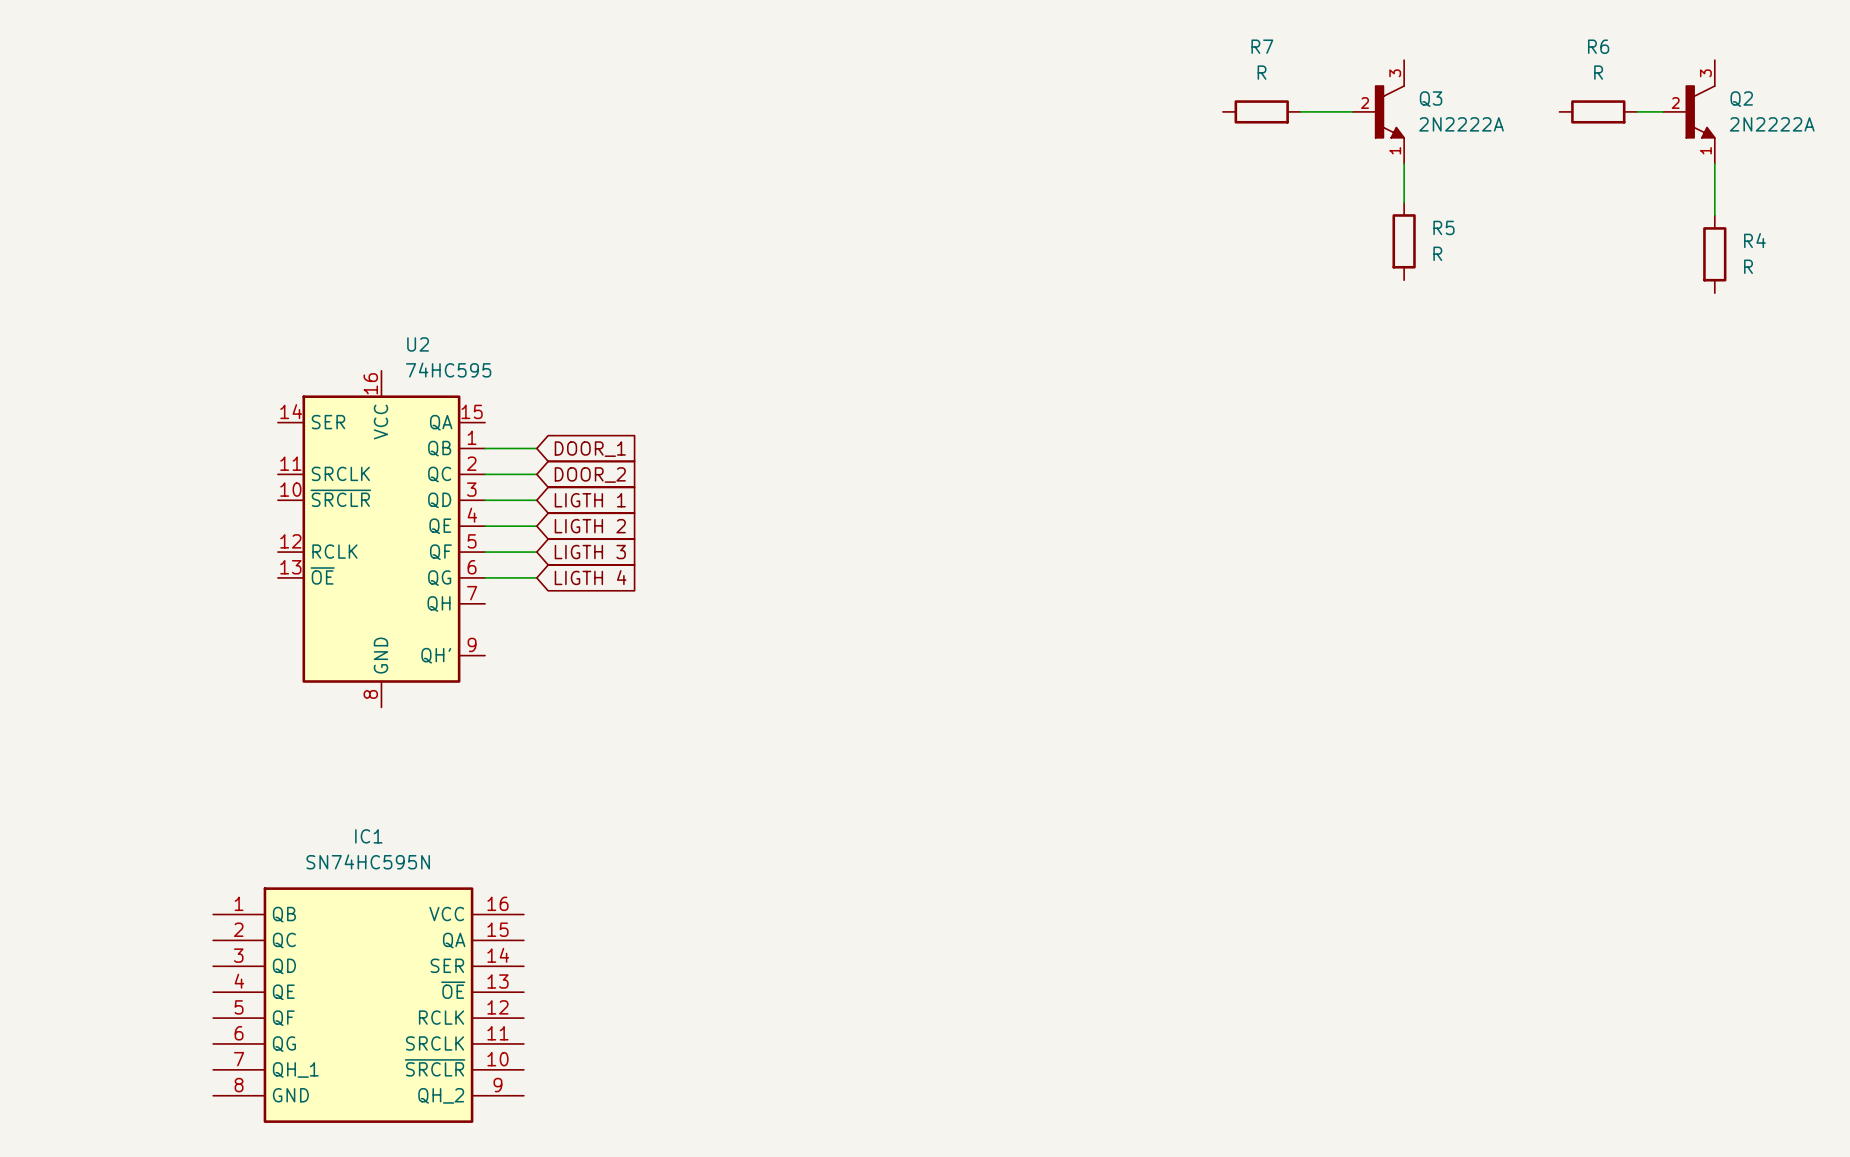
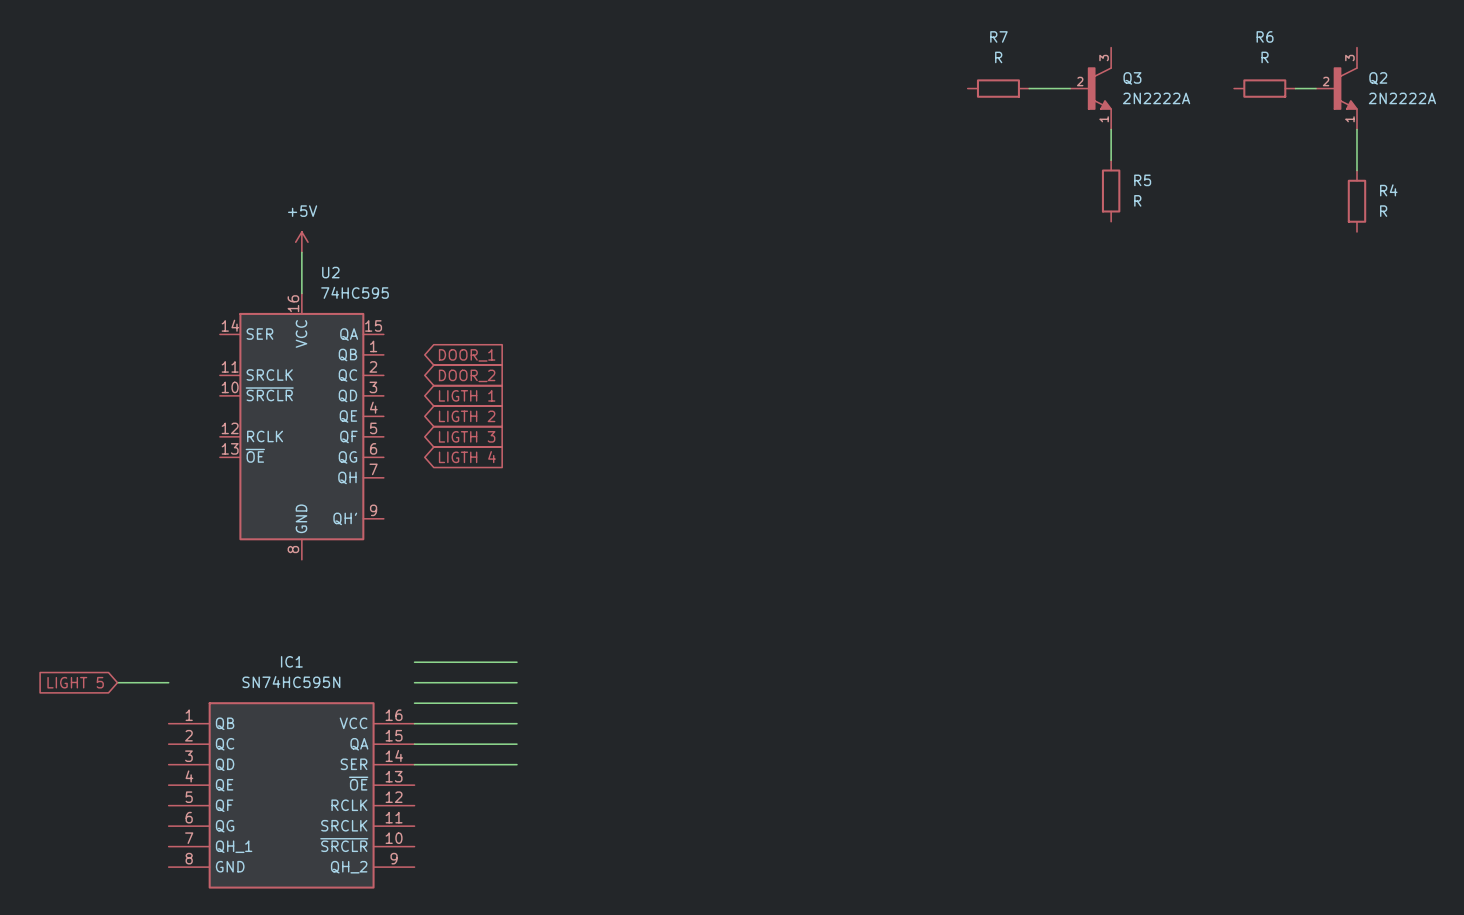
power symbol: none -> +5V (301, 242)
wire: none -> (301, 252) (301, 293)
wire: (485, 448) (536, 448) -> none
wire: (485, 474) (536, 474) -> none
wire: (485, 500) (536, 500) -> none
wire: (485, 526) (536, 526) -> none
wire: (485, 552) (536, 552) -> none
wire: (485, 577) (536, 577) -> none
wire: none -> (414, 662) (516, 662)
global label: none -> LIGHT 5 (75, 682)
wire: none -> (117, 682) (168, 682)
wire: none -> (414, 682) (516, 682)
wire: none -> (414, 703) (516, 703)
wire: none -> (414, 723) (516, 723)
wire: none -> (414, 744) (516, 744)
wire: none -> (414, 764) (516, 764)

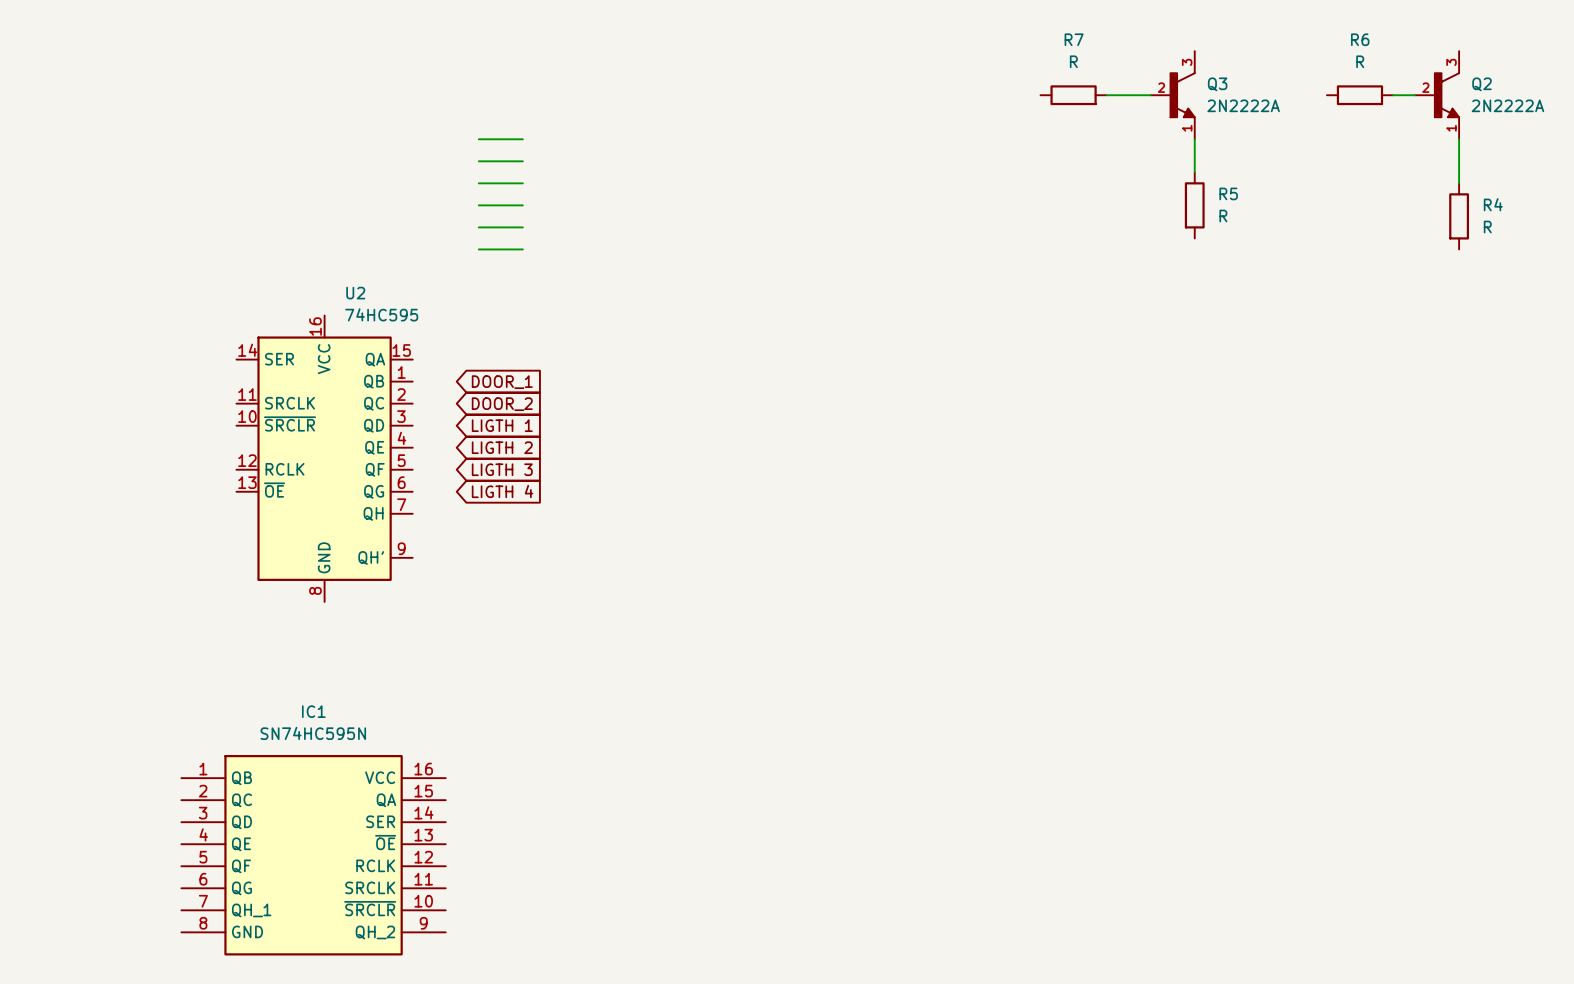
wire: none -> (478, 139) (522, 139)
wire: none -> (478, 161) (522, 161)
wire: none -> (478, 183) (522, 183)
wire: none -> (478, 205) (522, 205)
wire: none -> (478, 227) (522, 227)
wire: none -> (478, 249) (522, 249)
power symbol: +5V (301, 242) -> none
wire: (301, 252) (301, 293) -> none
wire: (414, 662) (516, 662) -> none
global label: LIGHT 5 (75, 682) -> none
wire: (117, 682) (168, 682) -> none
wire: (414, 682) (516, 682) -> none
wire: (414, 703) (516, 703) -> none
wire: (414, 723) (516, 723) -> none
wire: (414, 744) (516, 744) -> none
wire: (414, 764) (516, 764) -> none

